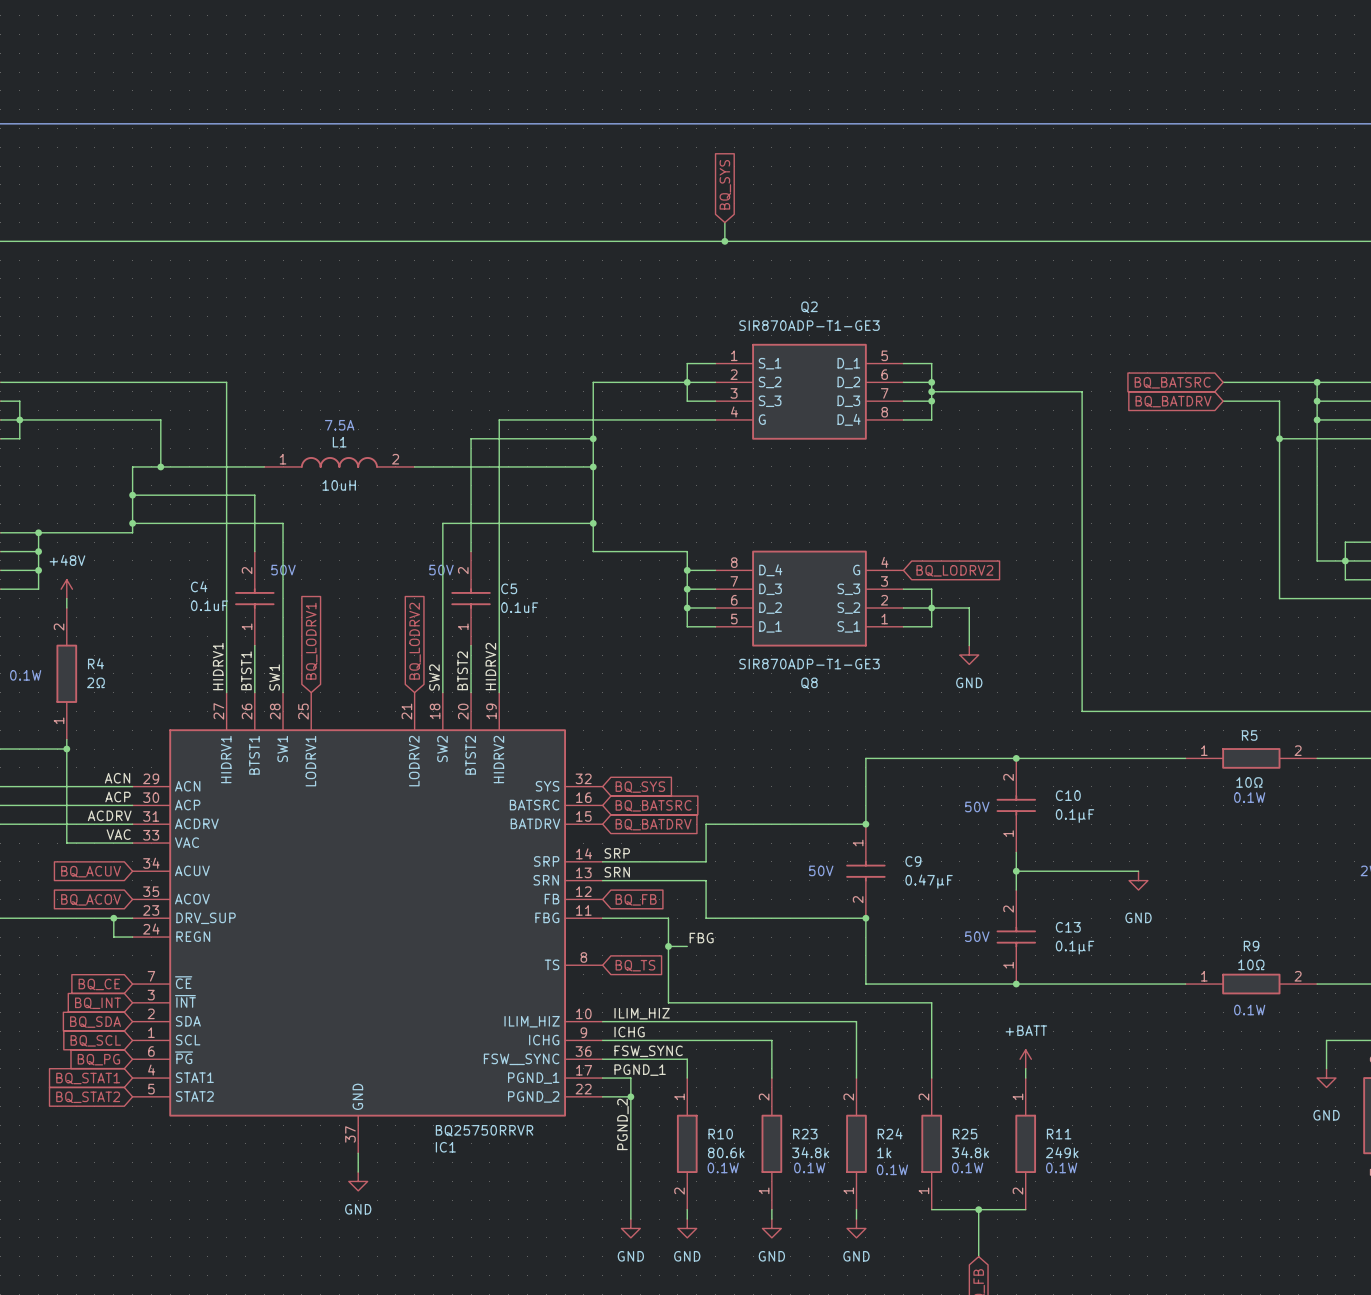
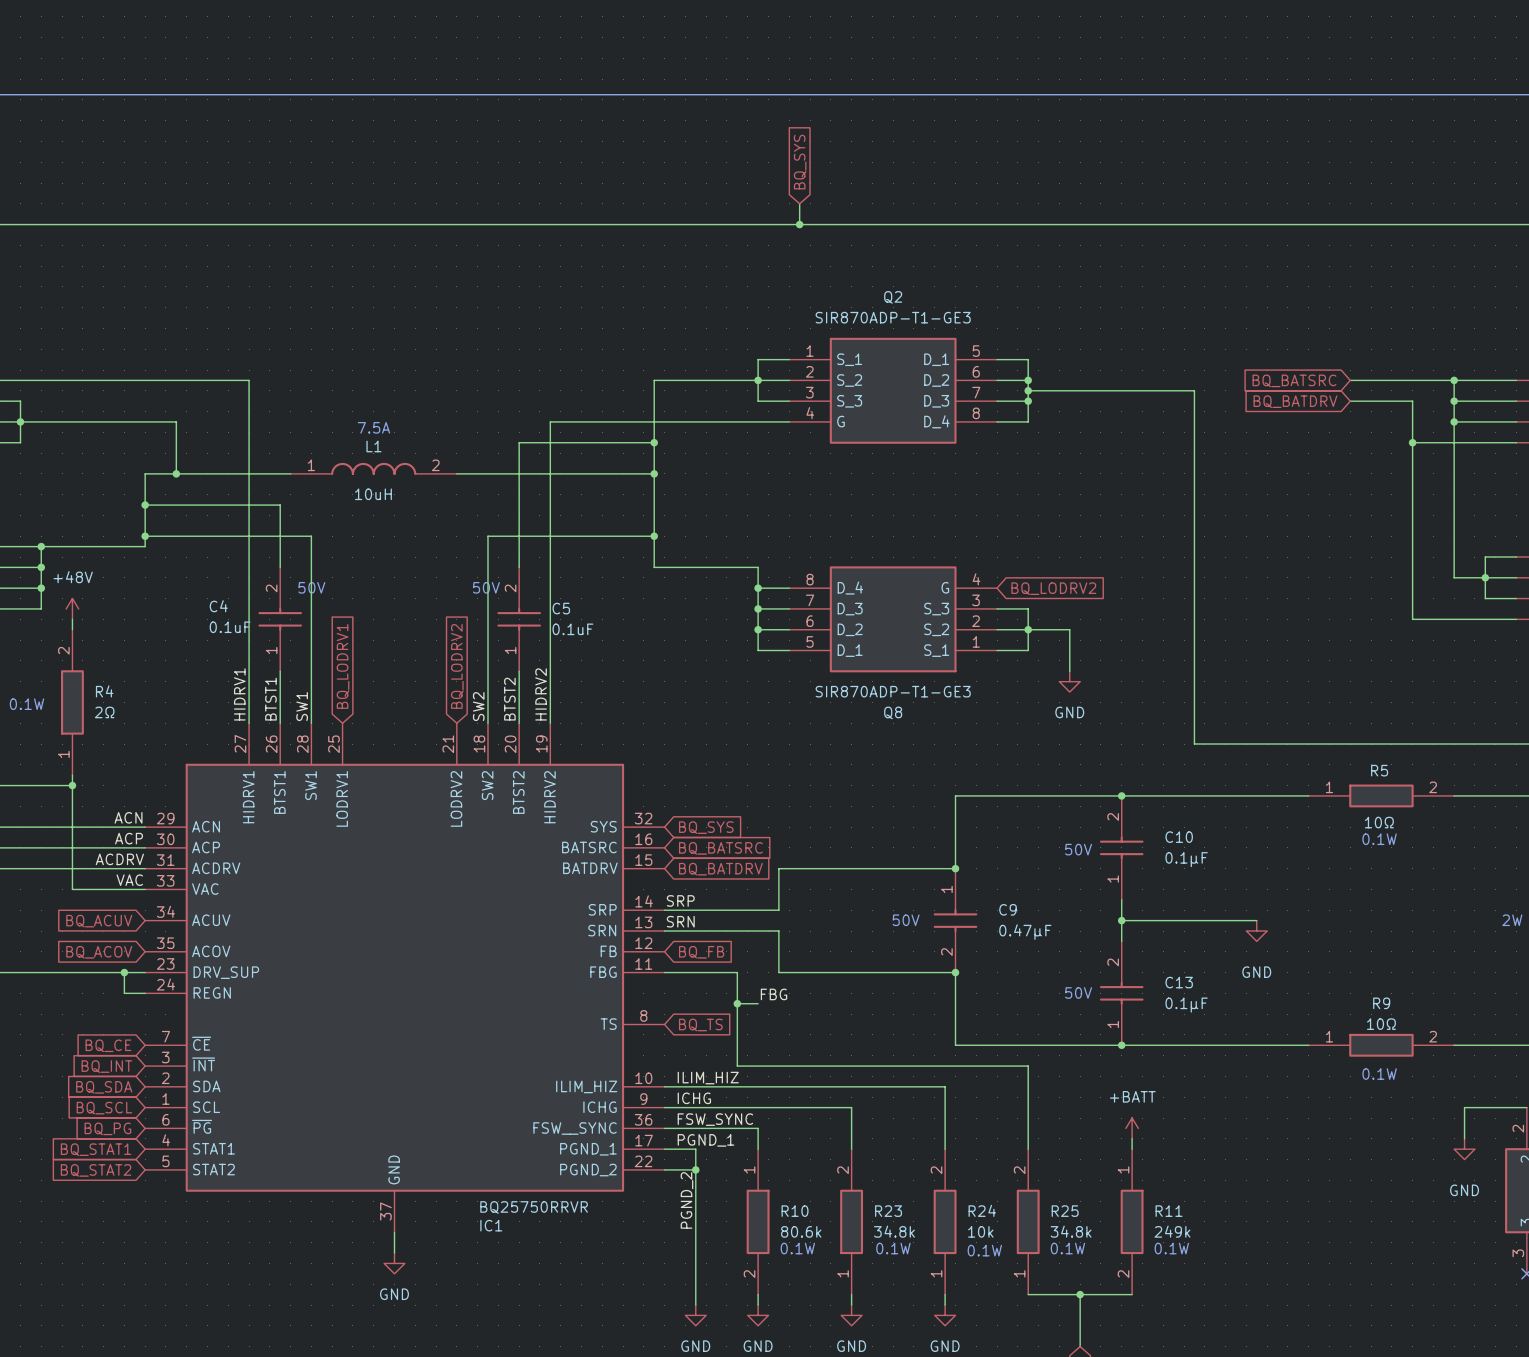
R24 value: 1k (884, 1152) -> 10k (980, 1231)

